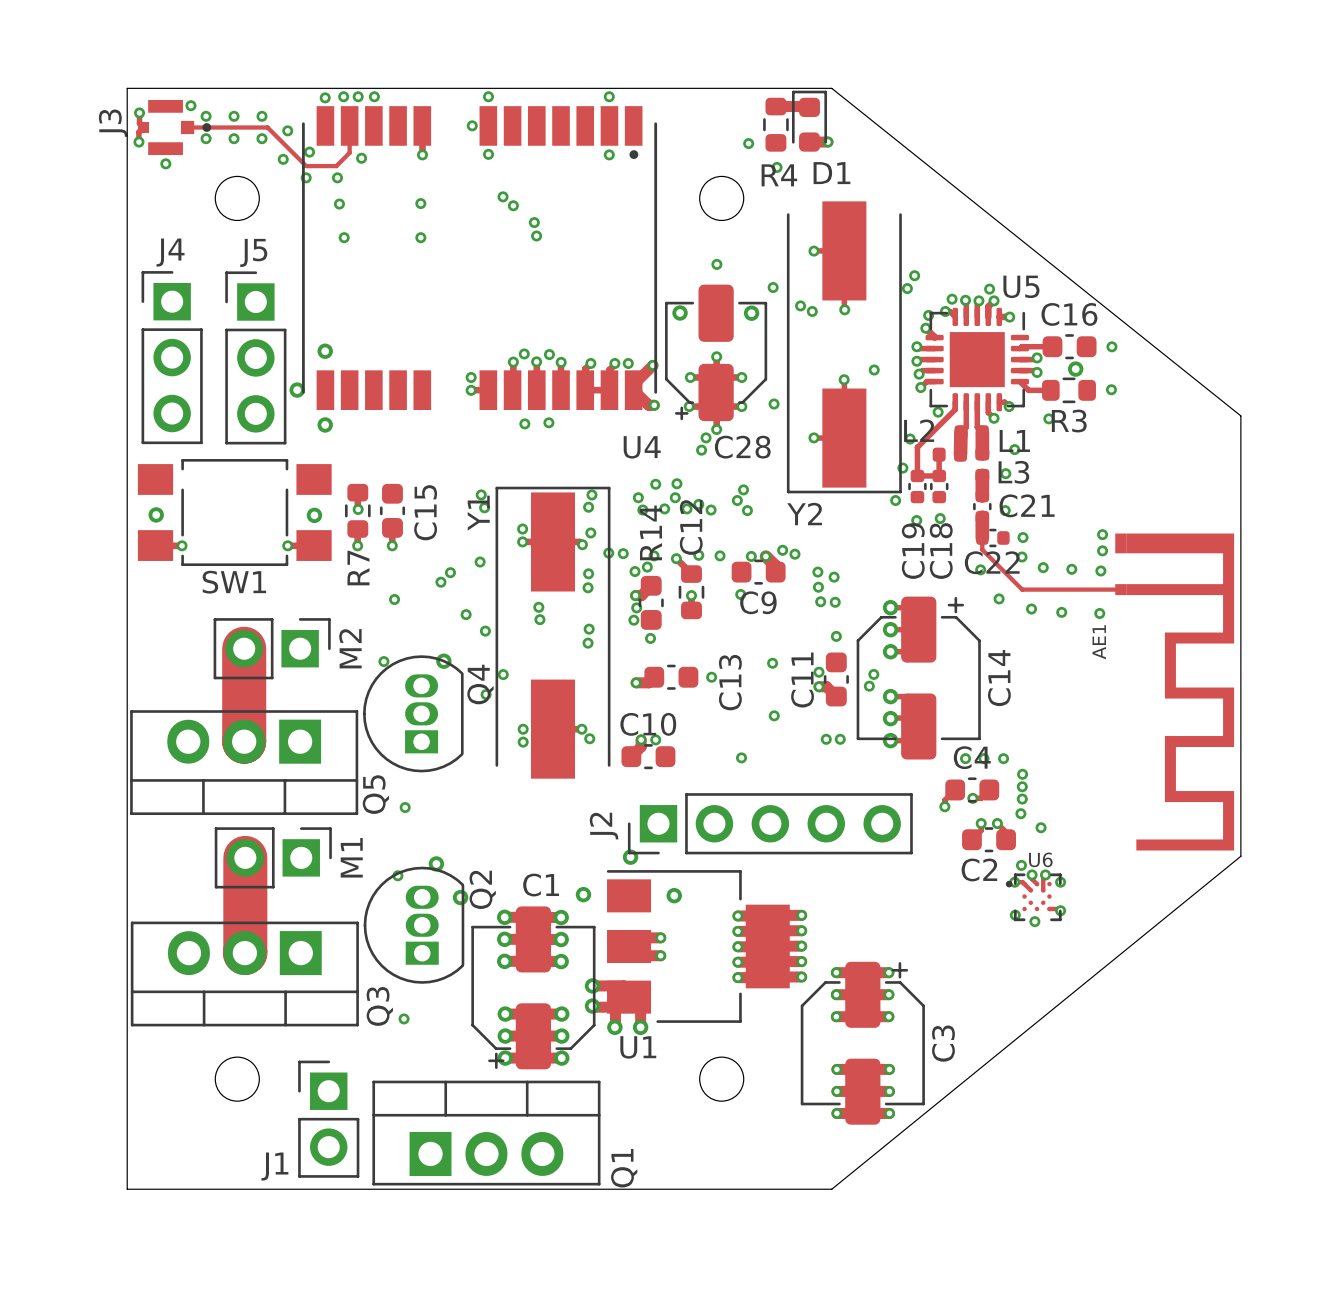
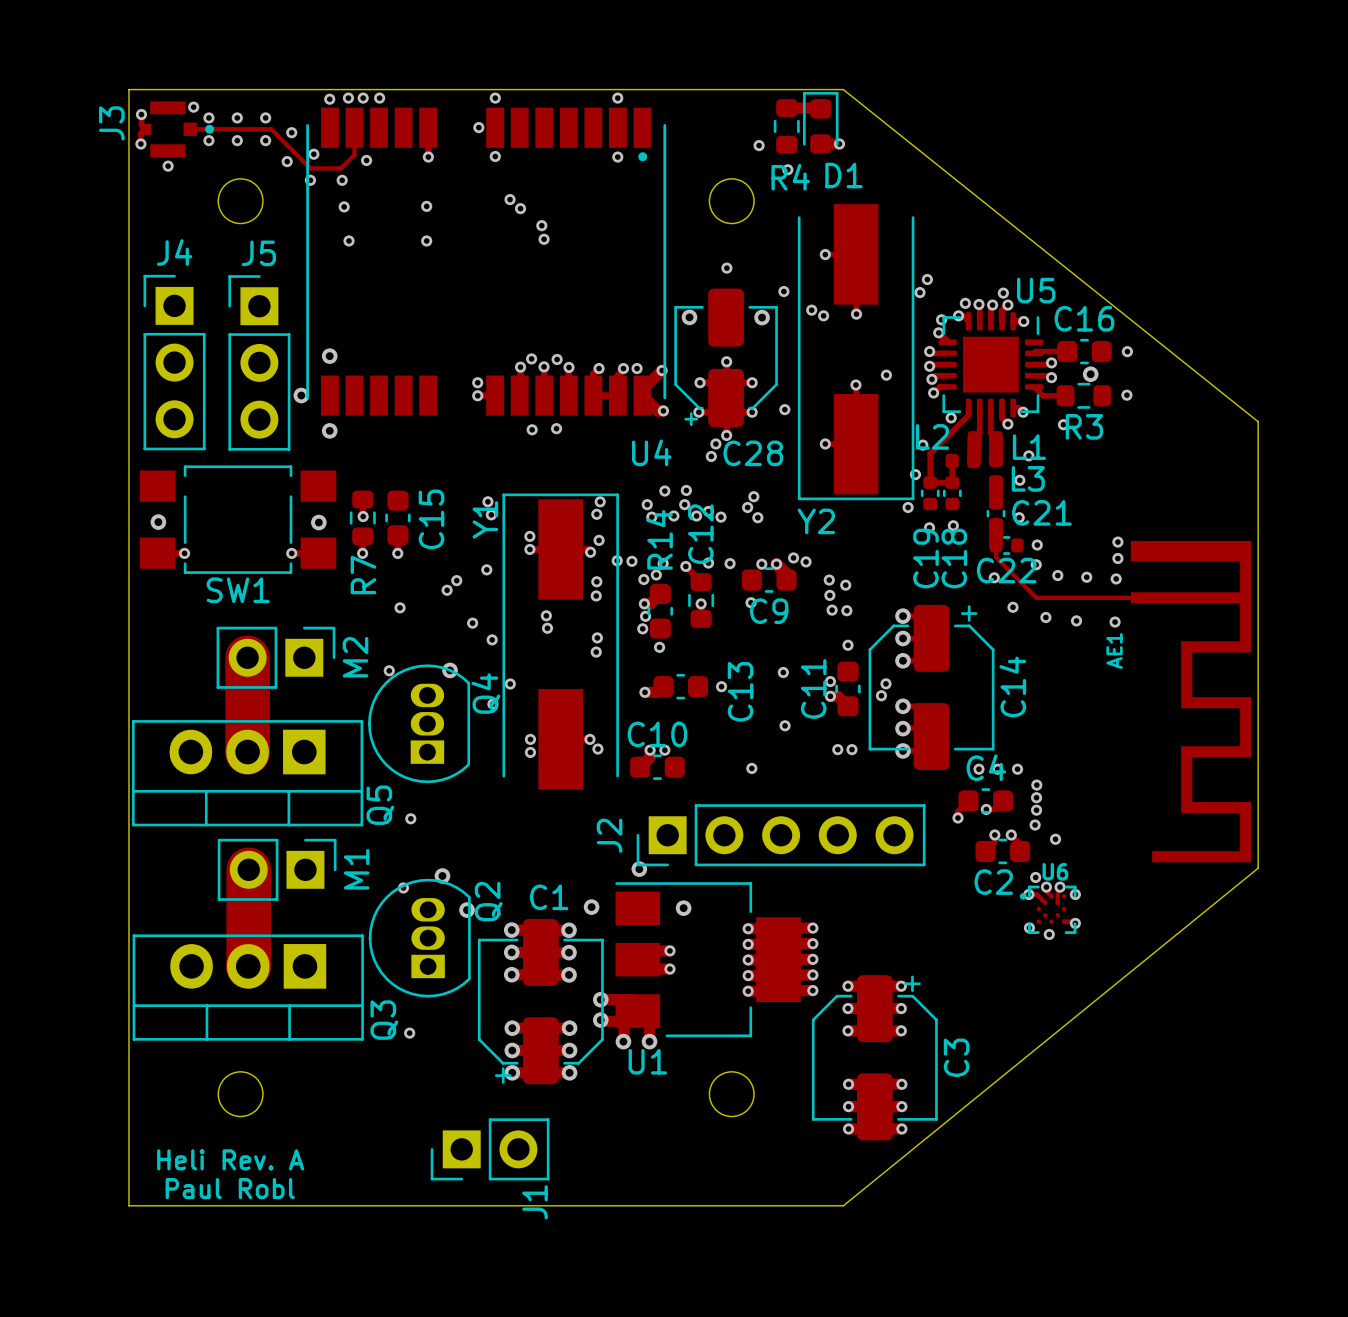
J1 rotation: 0° (328, 1119) -> 90° counterclockwise (490, 1149)
J1 position: (328, 1119) -> (490, 1149)
Q1: (486, 1133) -> none
text: none -> Heli Rev. A (230, 1159)
text: none -> Paul Robl (230, 1188)

